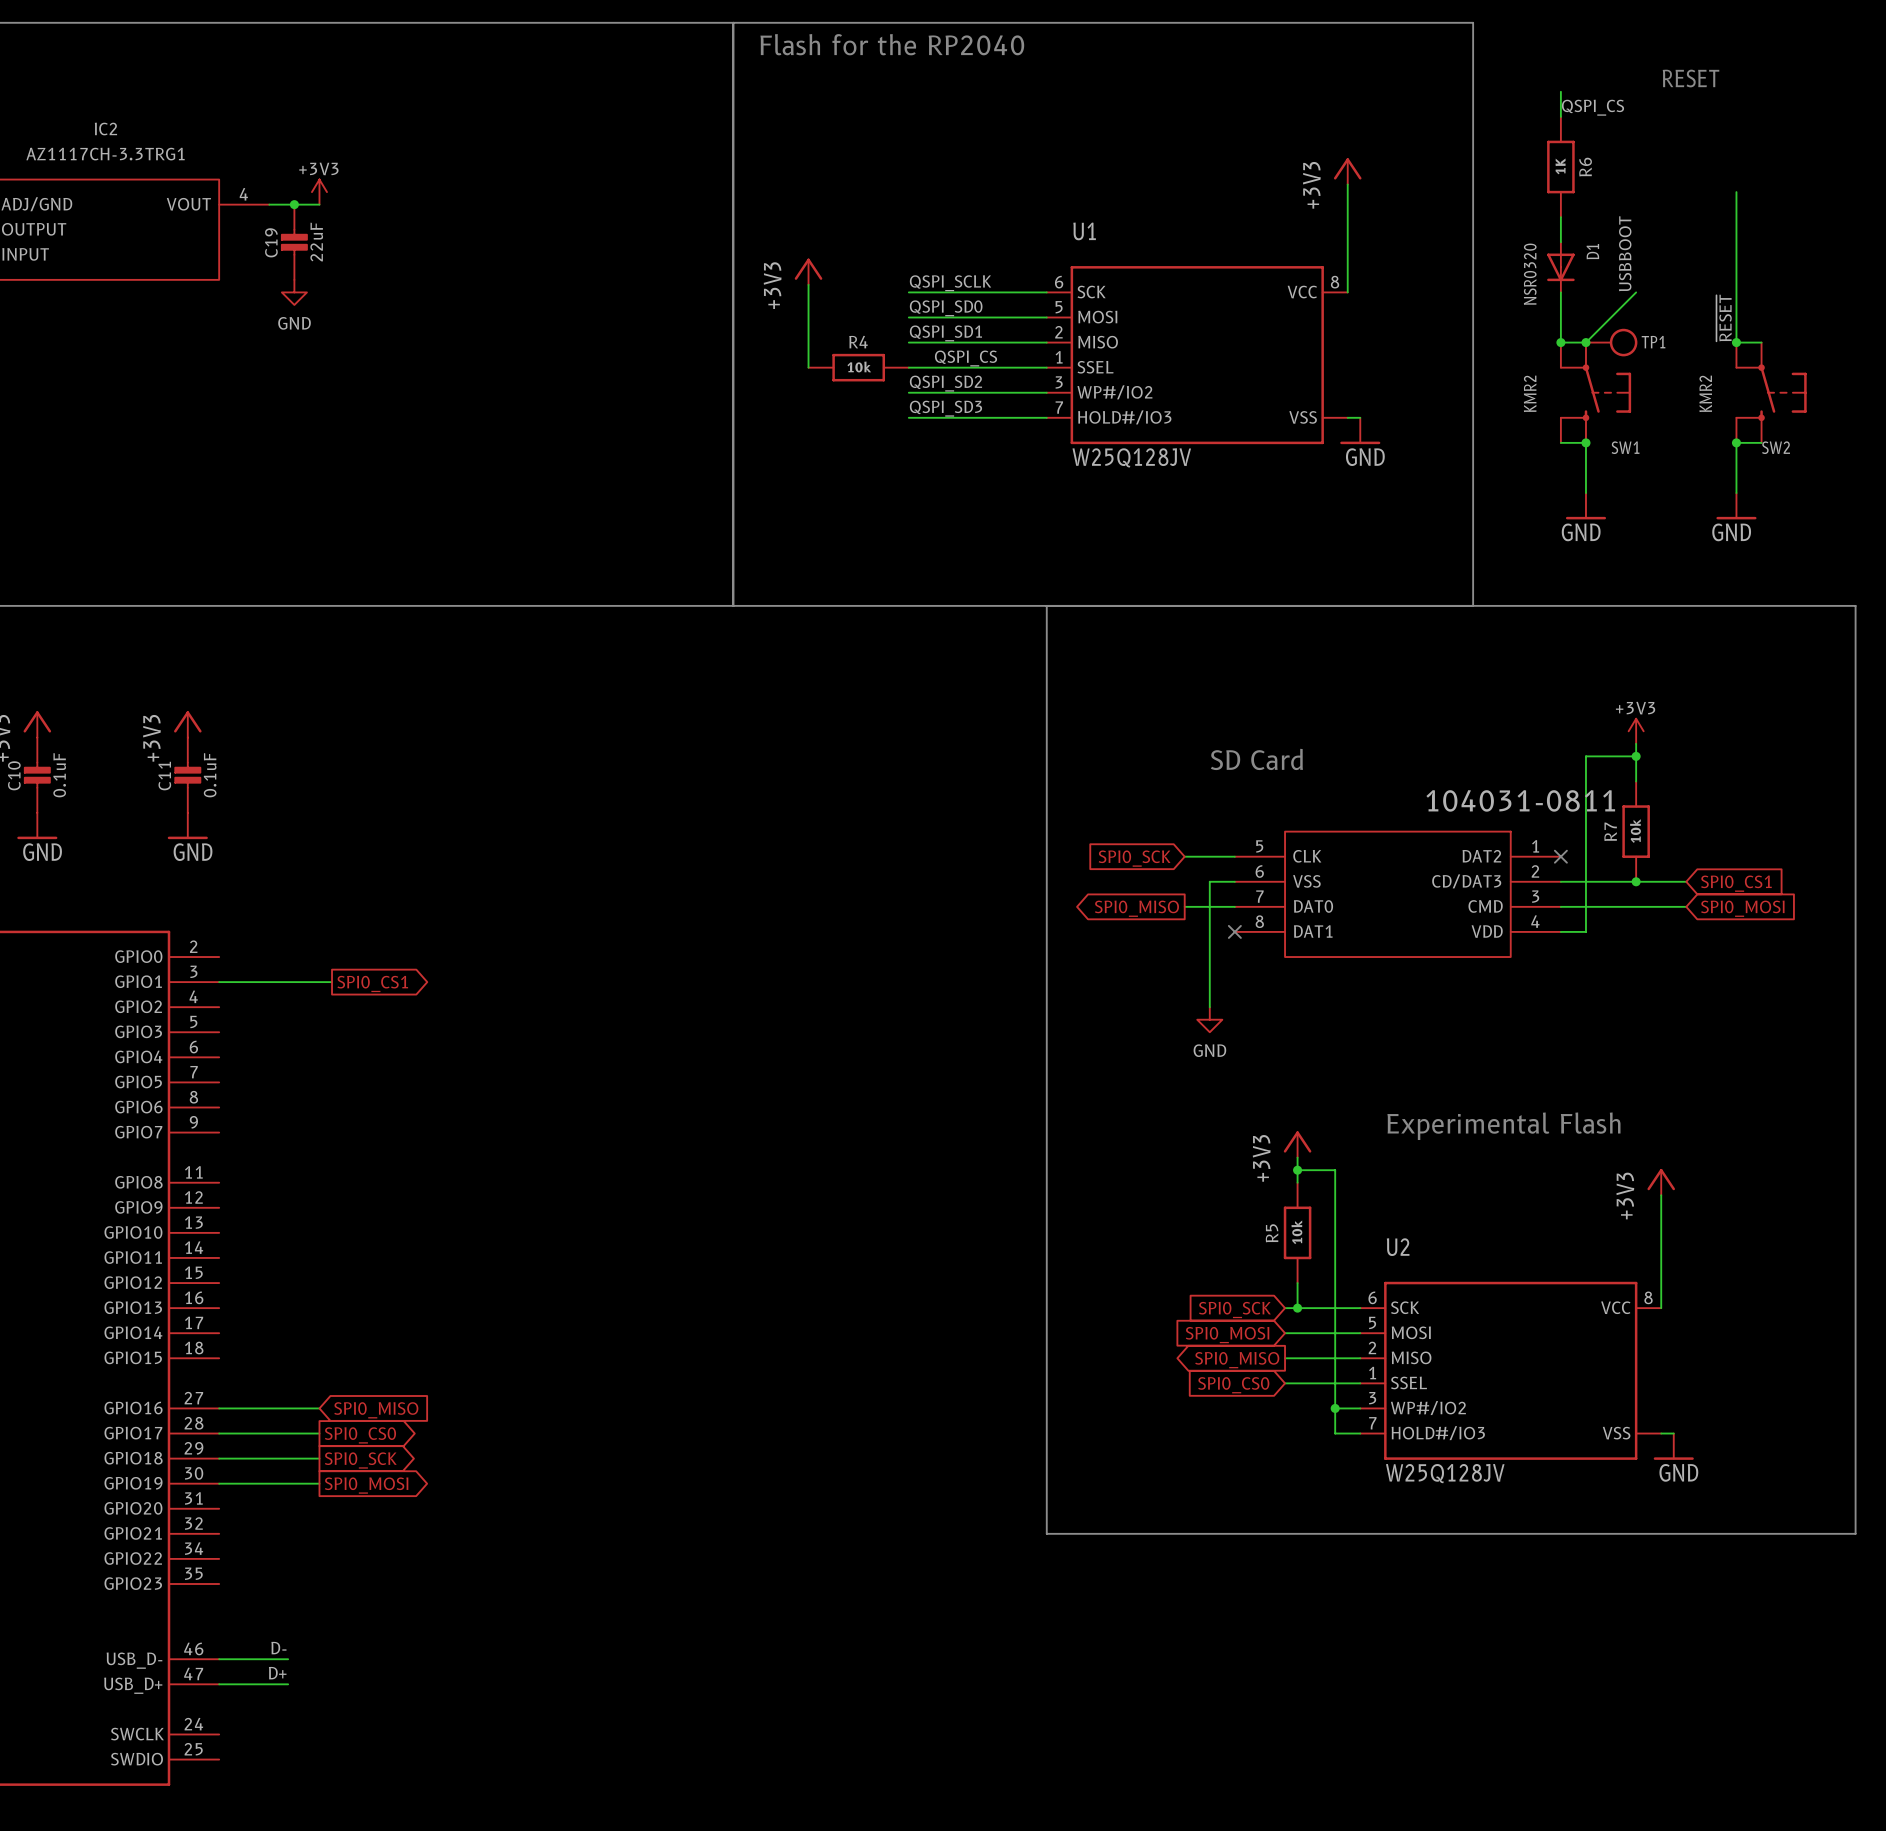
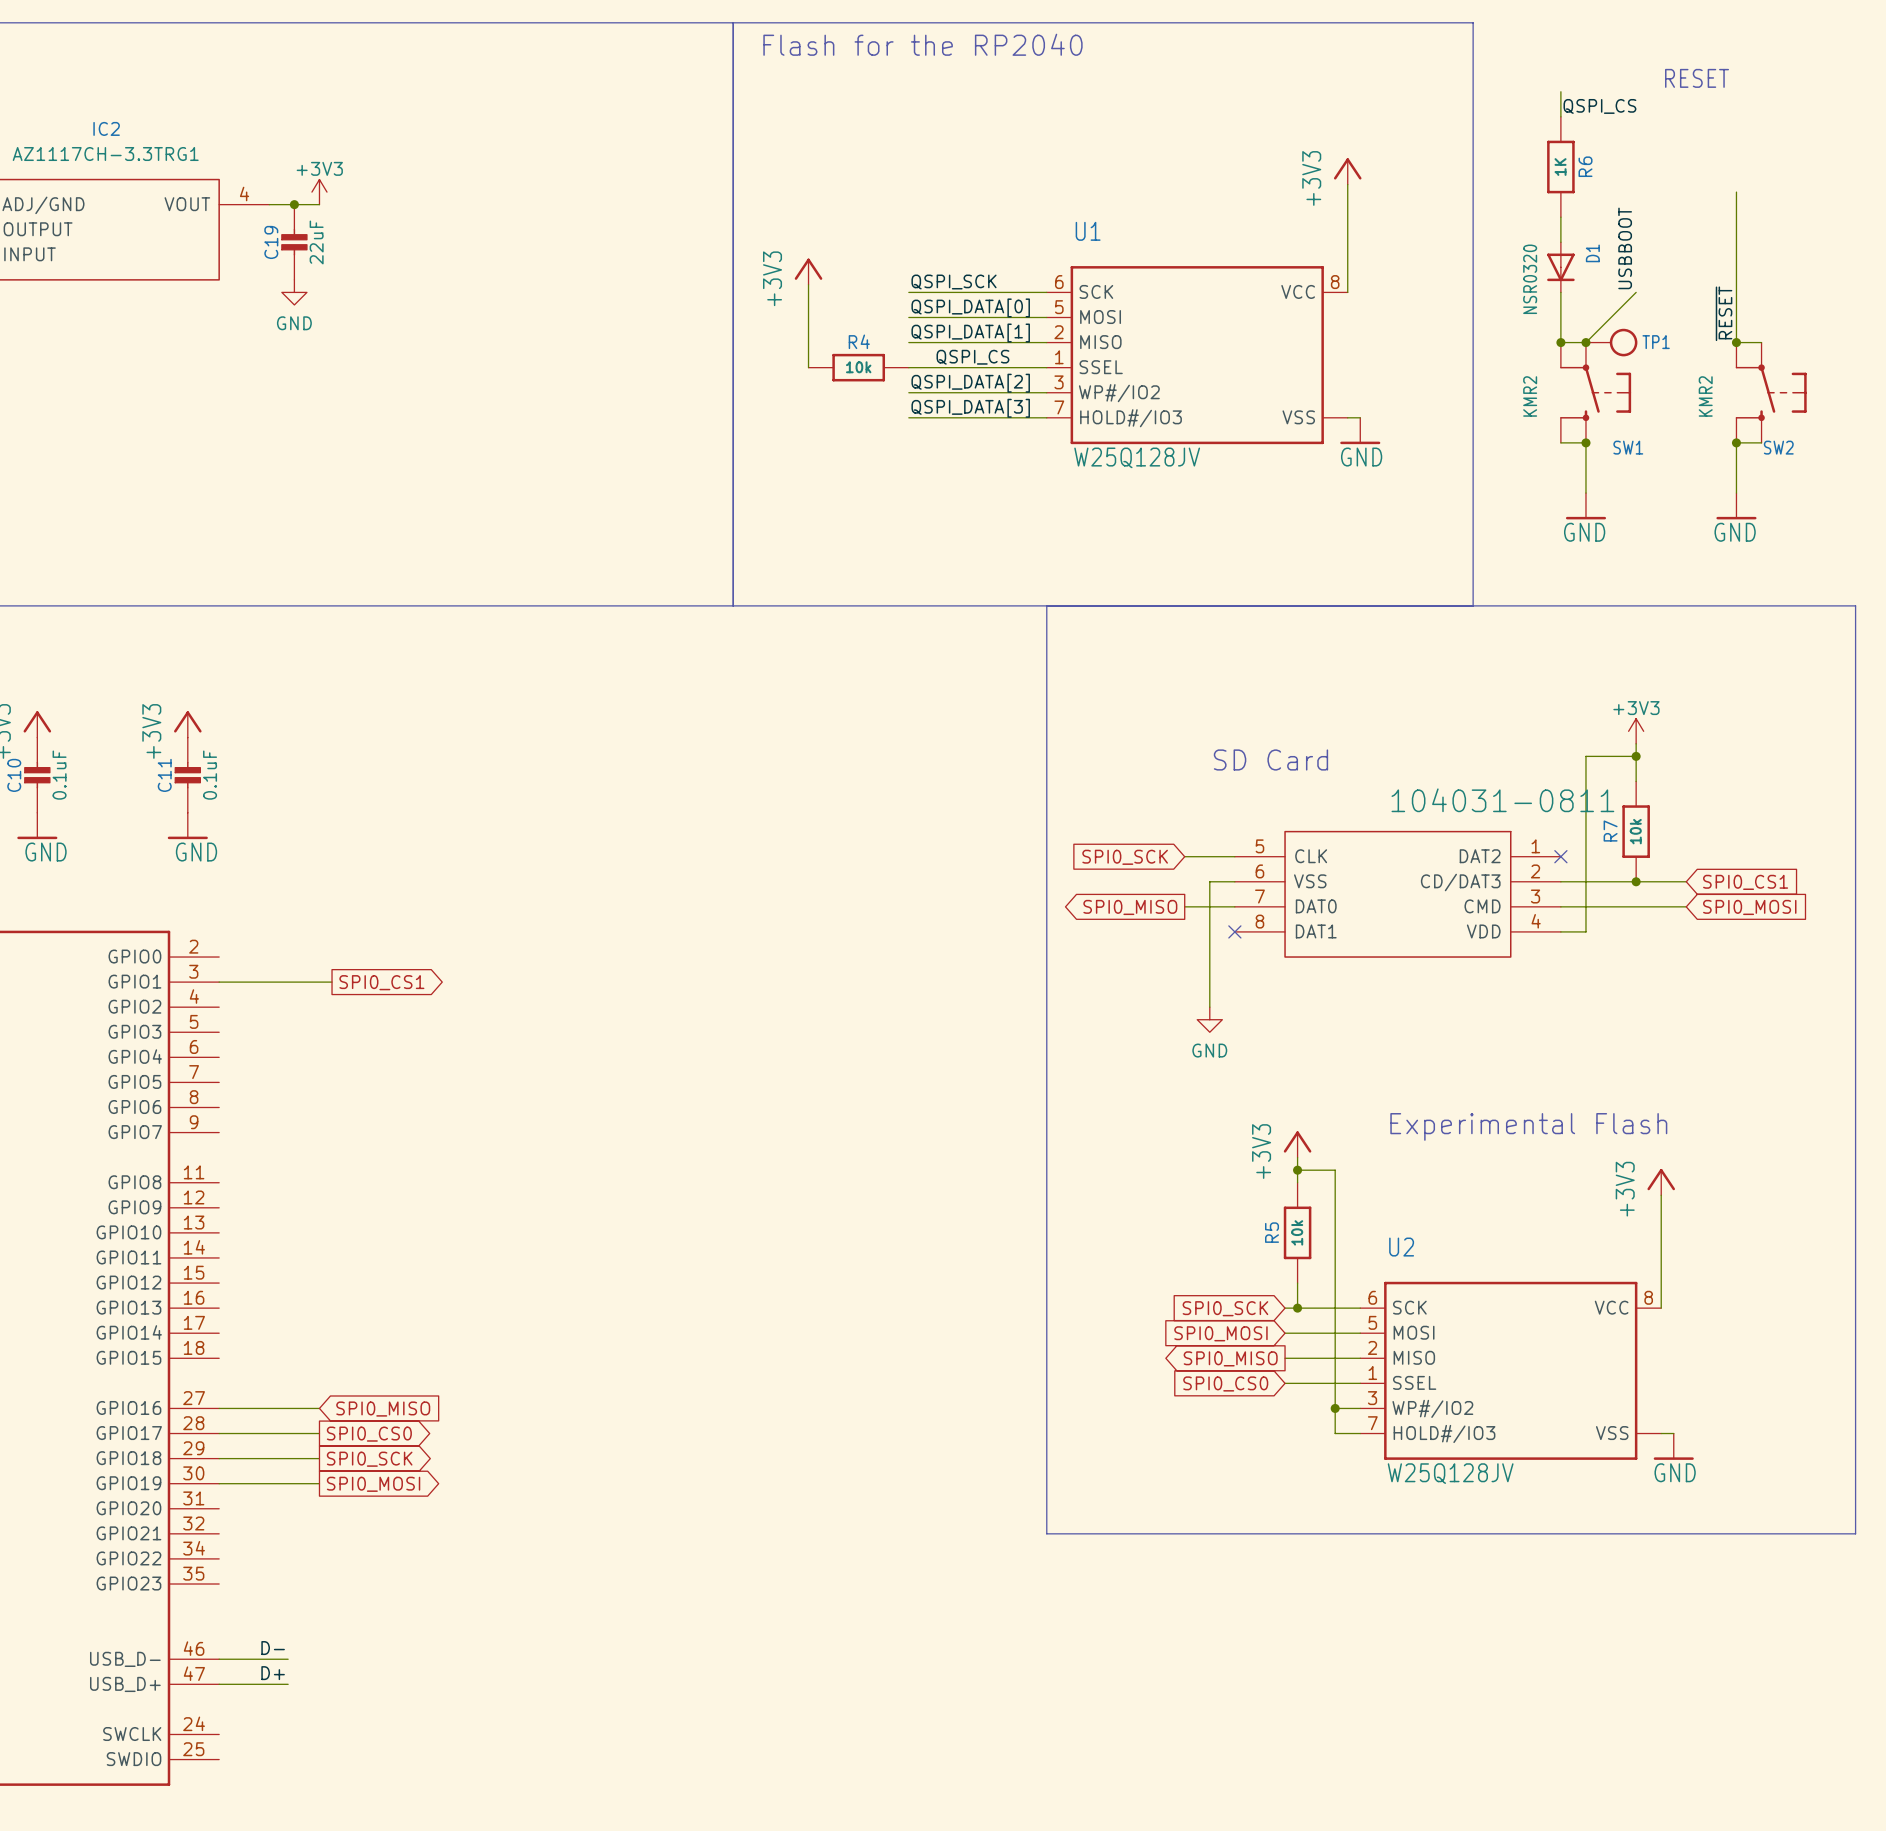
label: QSPI_SCLK (950, 283) -> QSPI_SCK (954, 282)
label: QSPI_SD0 (946, 308) -> QSPI_DATA[0] (970, 307)
label: QSPI_SD1 (945, 333) -> QSPI_DATA[1] (970, 333)
label: QSPI_SD2 (945, 383) -> QSPI_DATA[2] (970, 383)
label: QSPI_SD3 (945, 408) -> QSPI_DATA[3] (970, 408)

